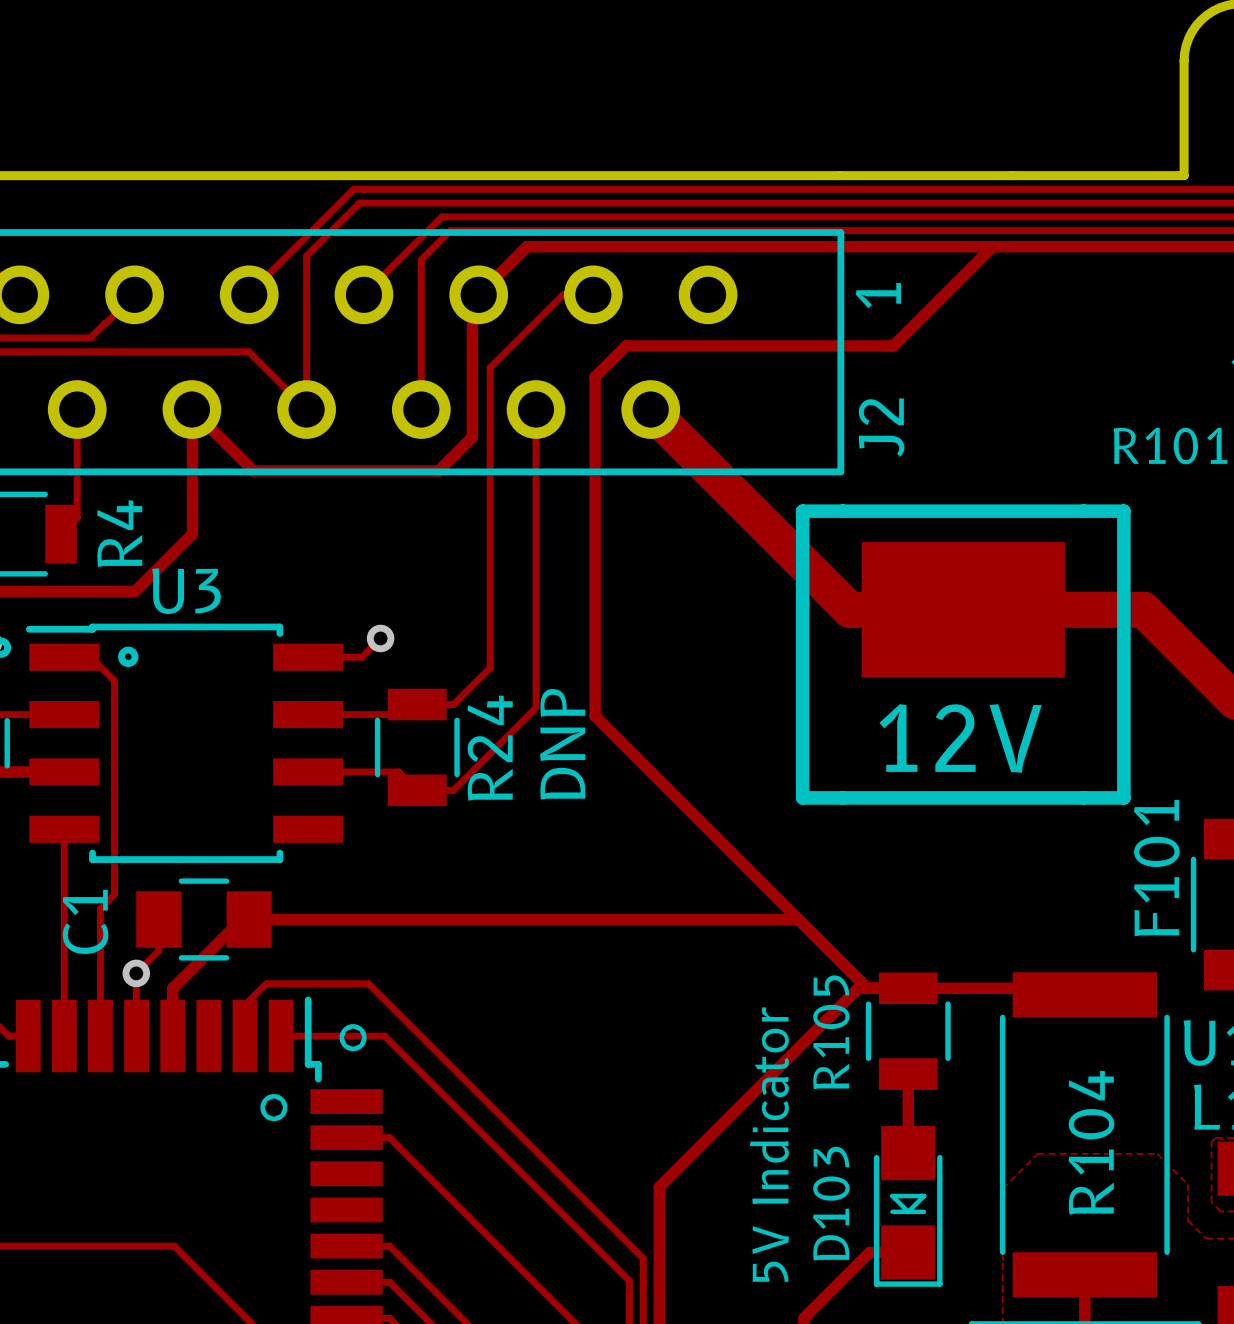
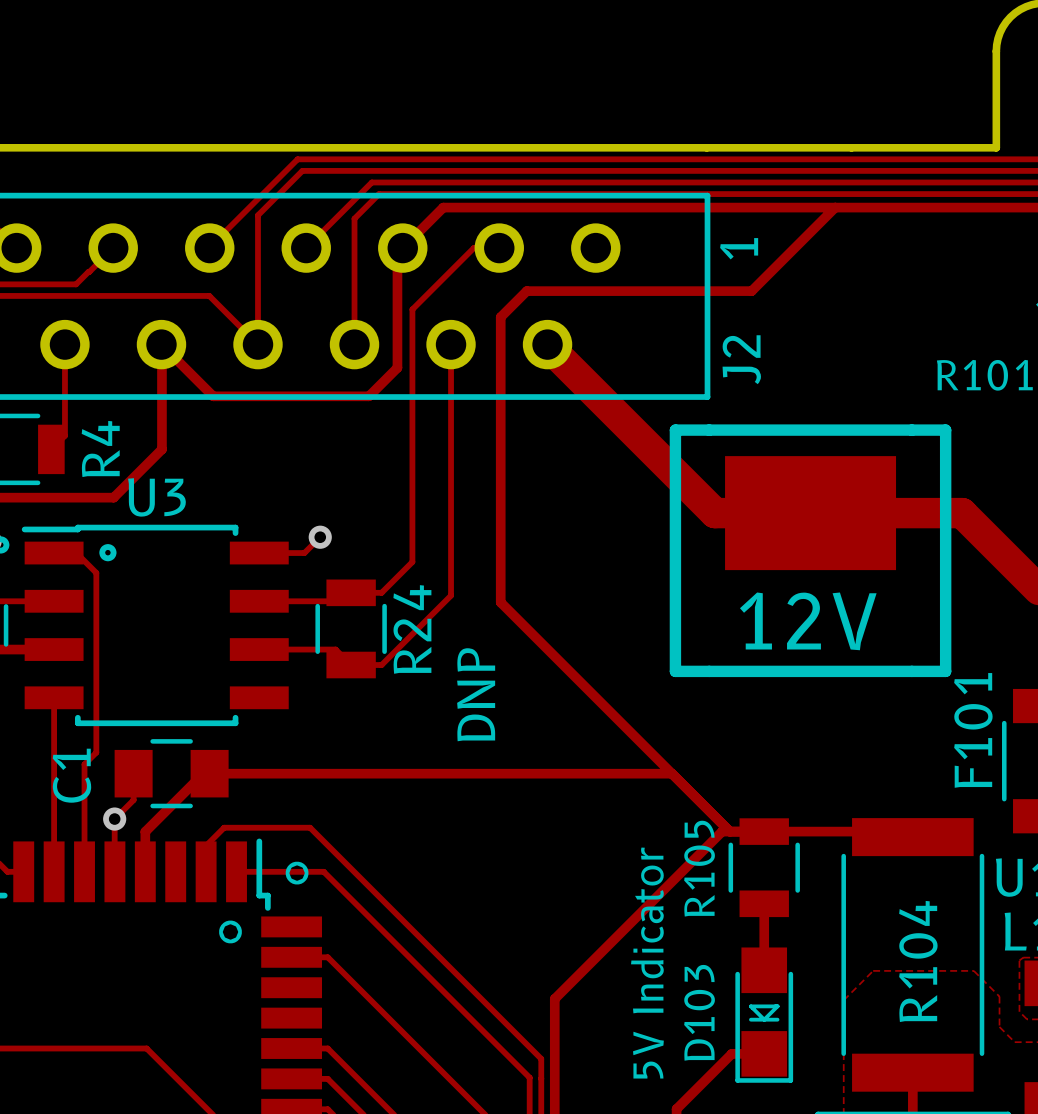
text position: DNP (562, 744) -> DNP (476, 694)

